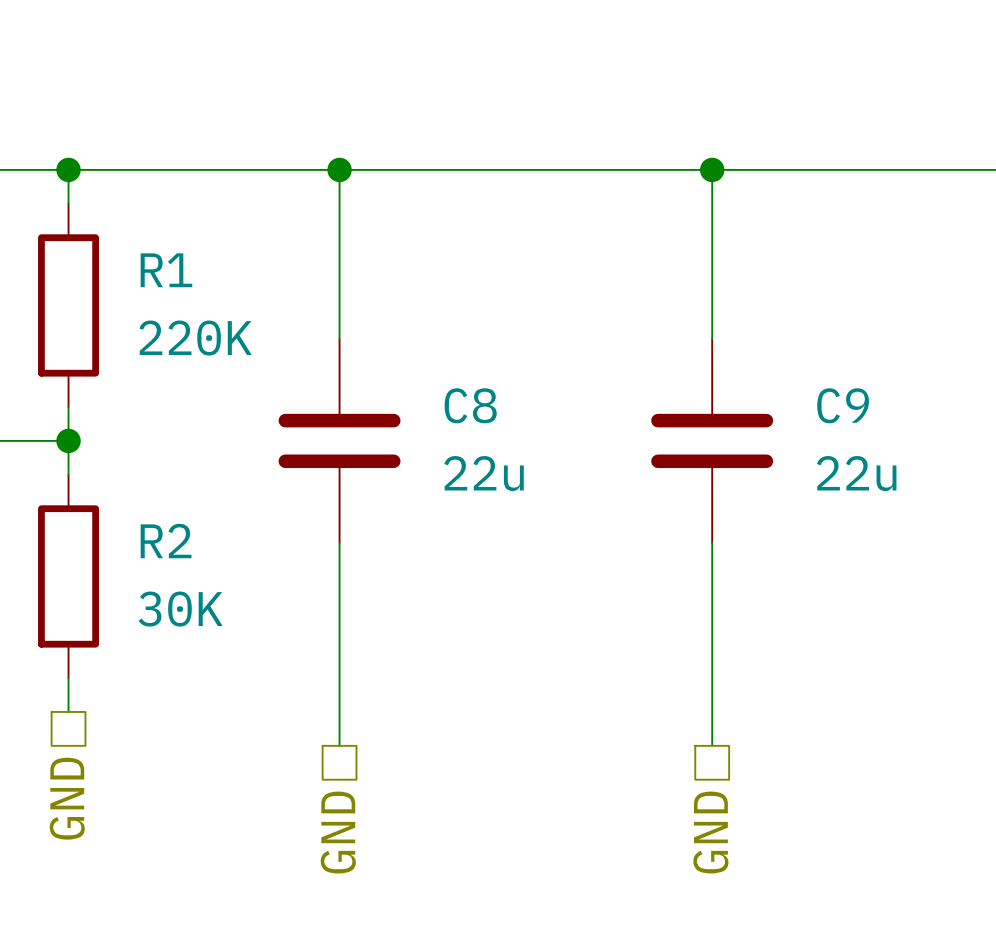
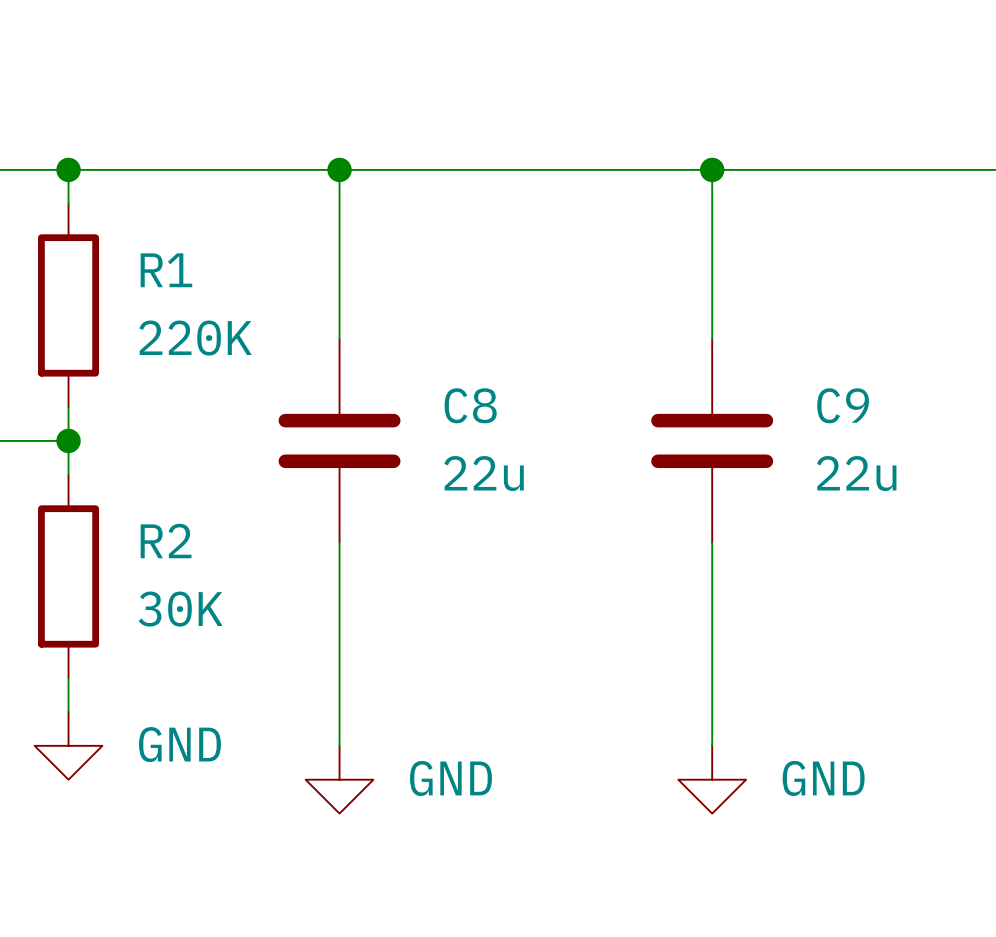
power symbol: none -> GND (68, 745)
power symbol: none -> GND (339, 779)
power symbol: none -> GND (712, 779)
hierarchical label: GND (67, 798) -> none
hierarchical label: GND (338, 832) -> none
hierarchical label: GND (710, 832) -> none

